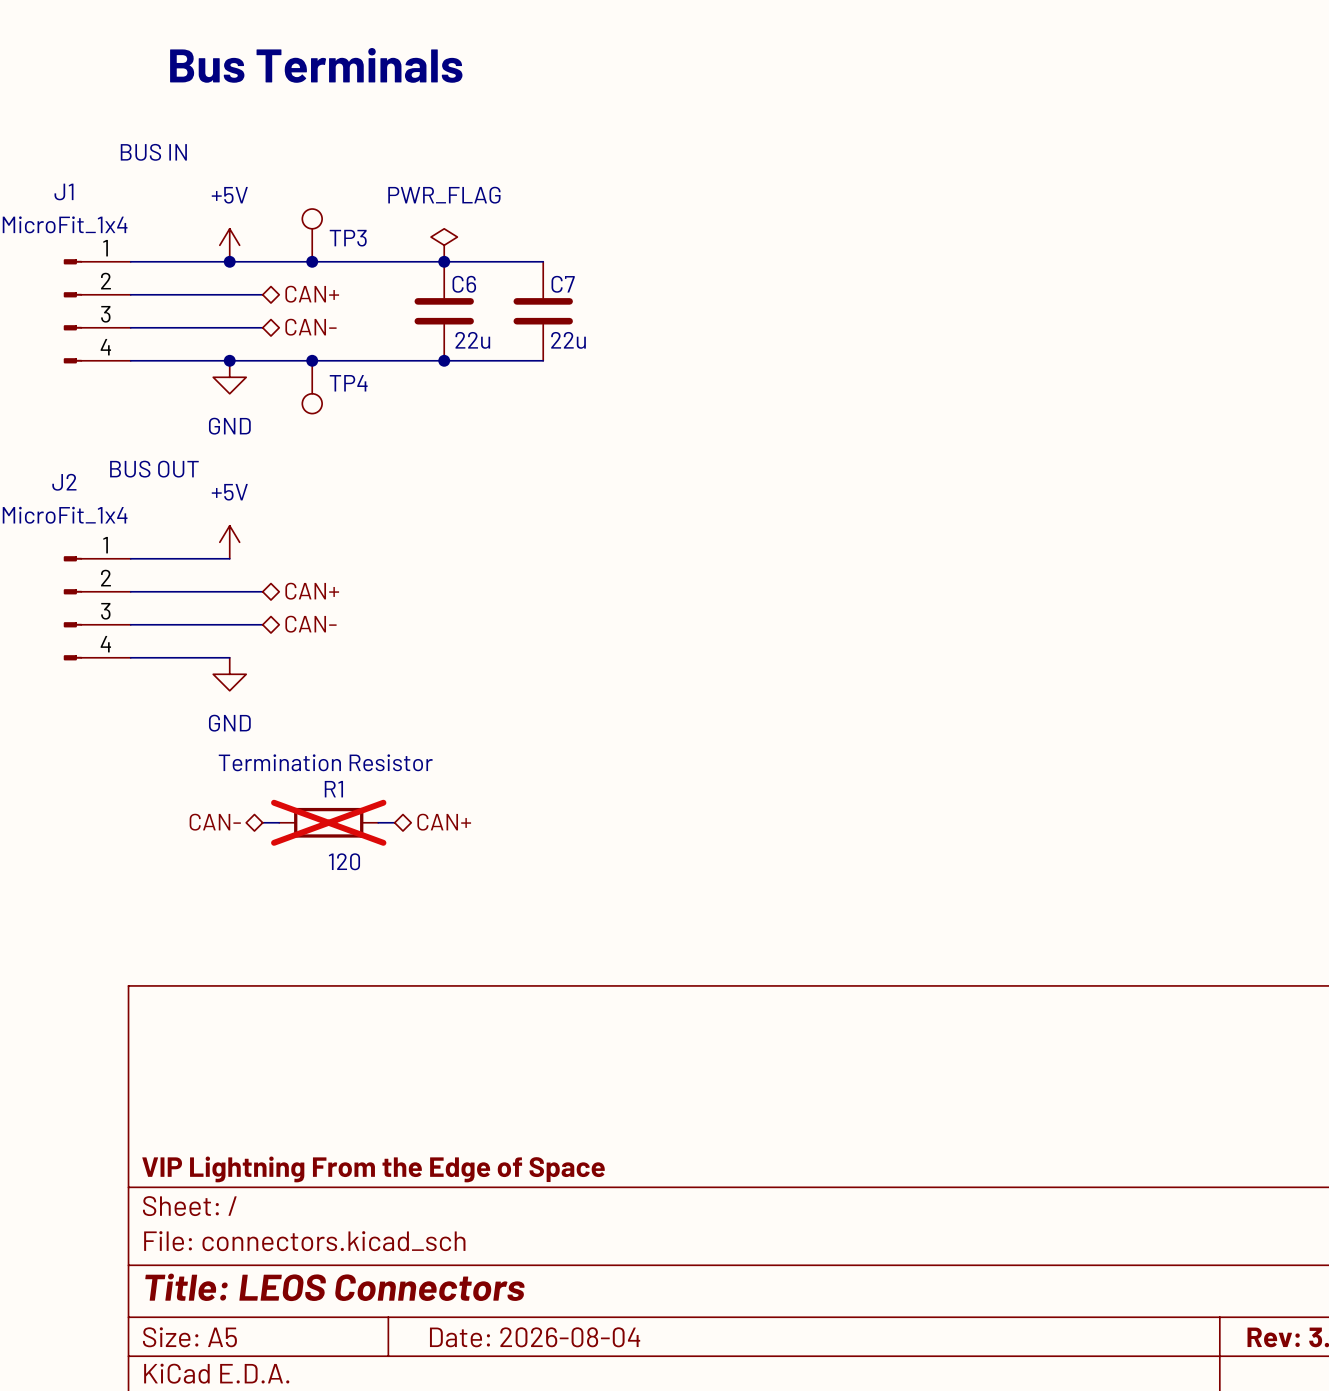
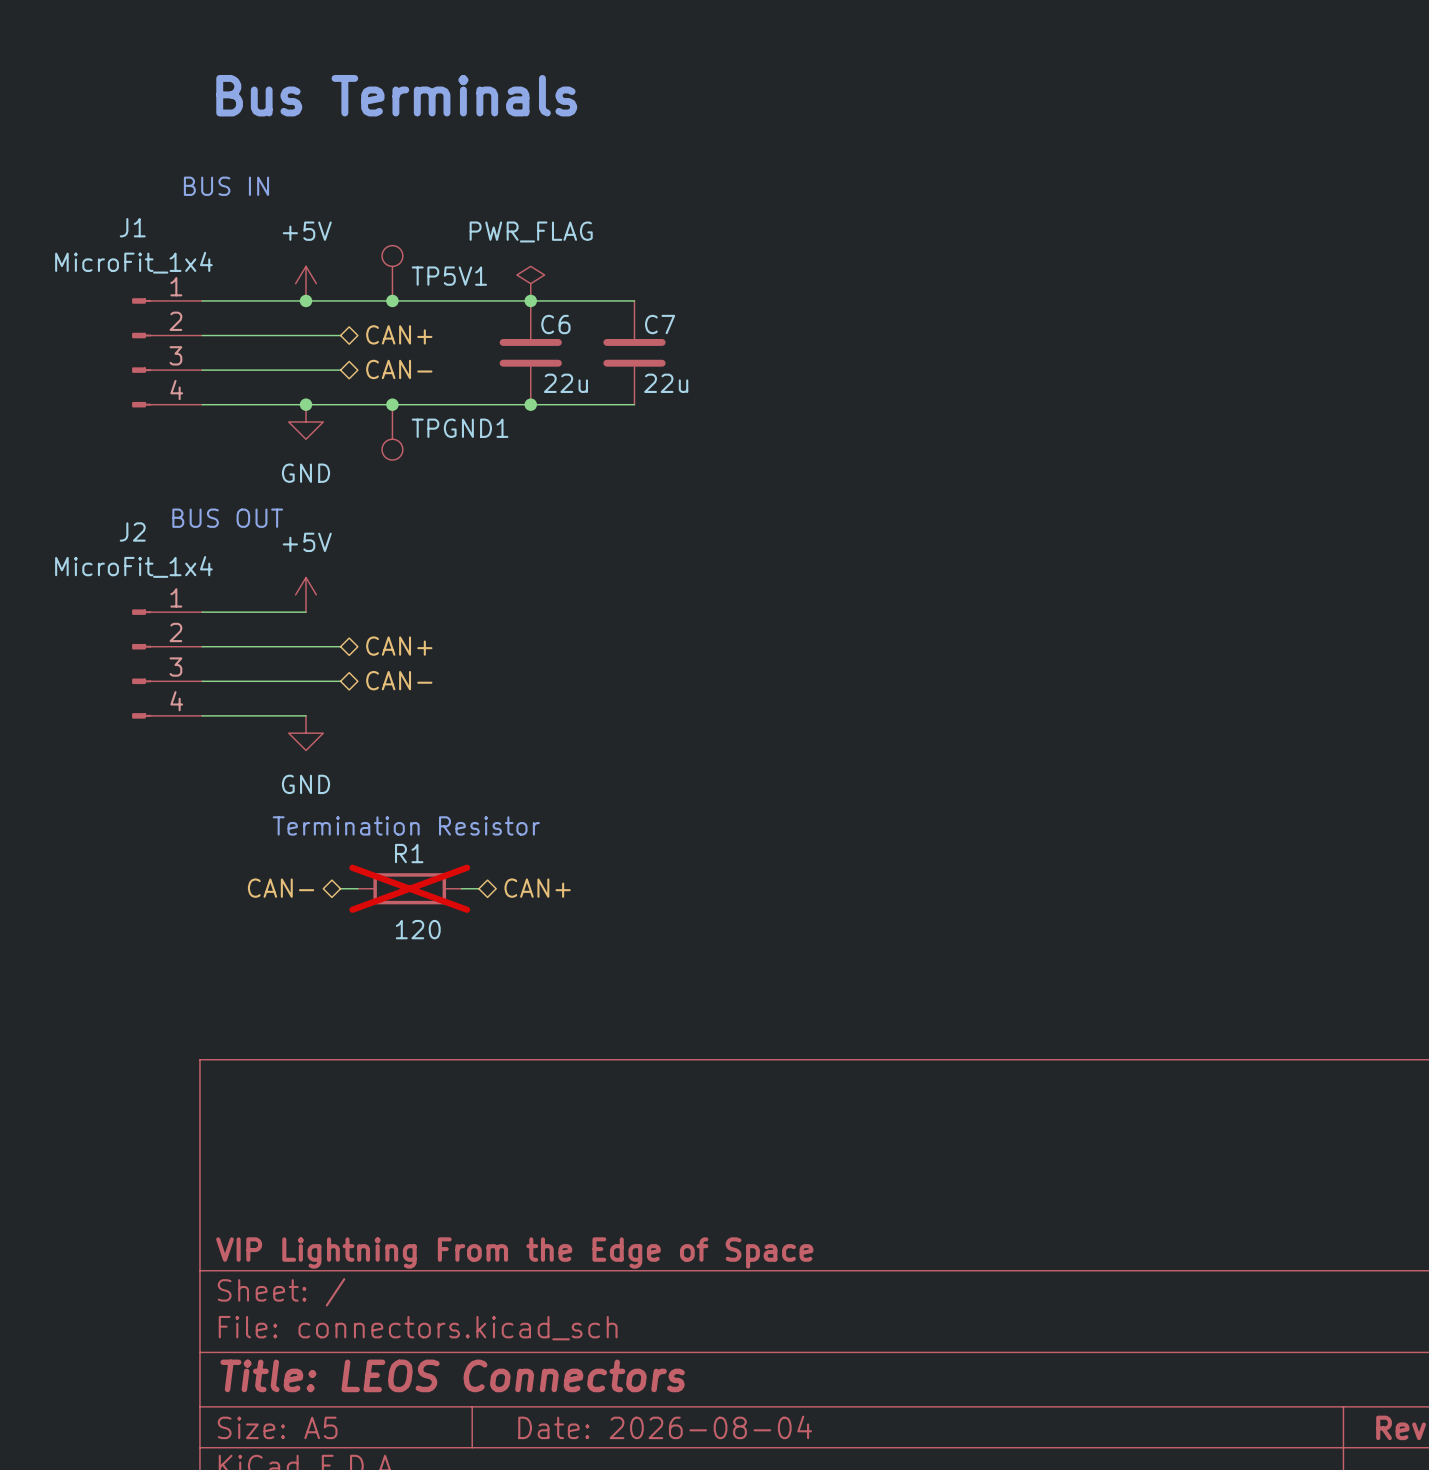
TP3 name: TP3 (348, 238) -> TP5V1 (449, 276)
TP4 name: TP4 (348, 383) -> TPGND1 (460, 428)

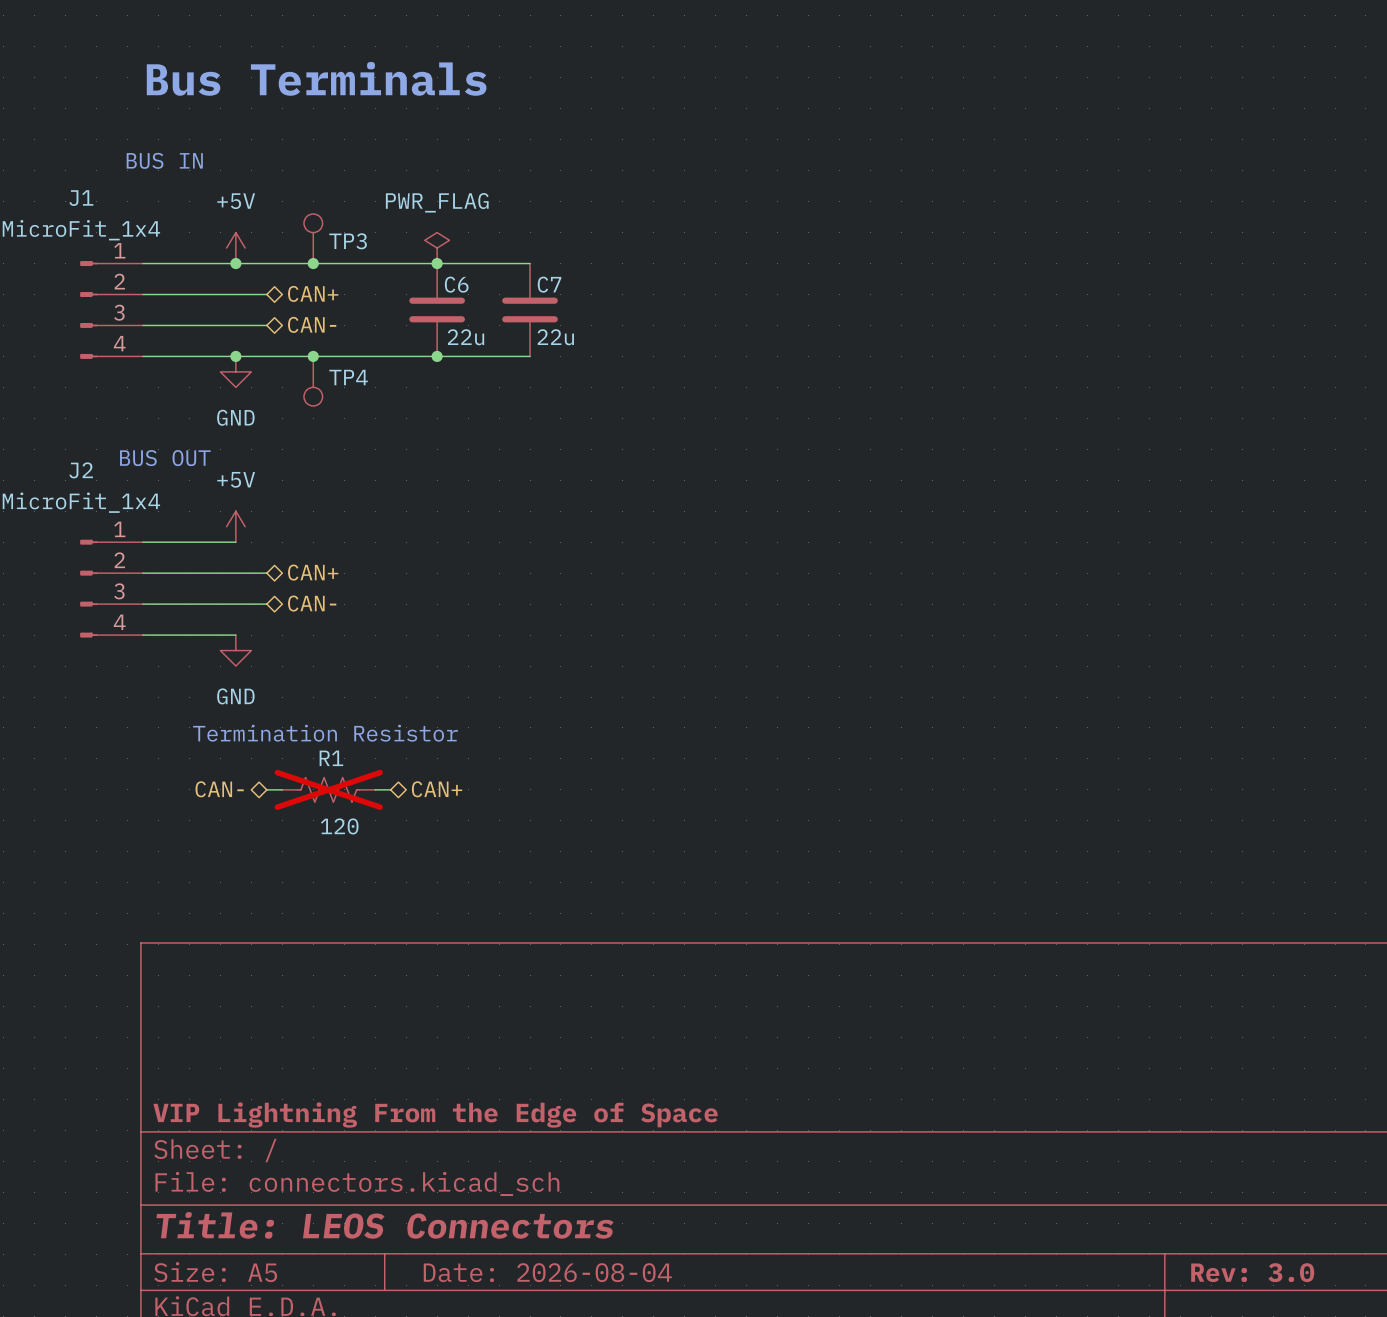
TP5V1 name: TP5V1 (449, 276) -> TP3 (348, 241)
TPGND1 name: TPGND1 (460, 428) -> TP4 (348, 377)
R1 symbol: [357, 873, 462, 905] -> [282, 777, 376, 803]

